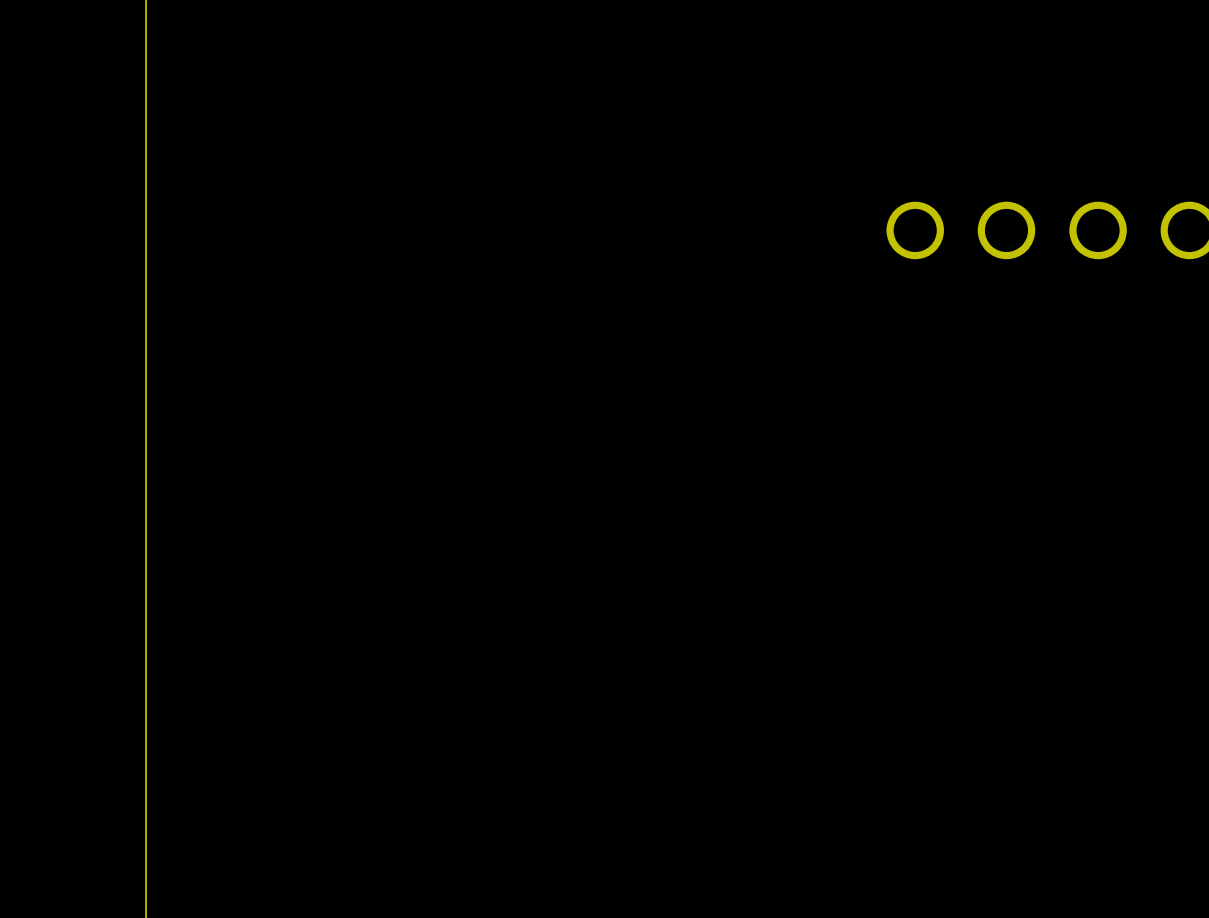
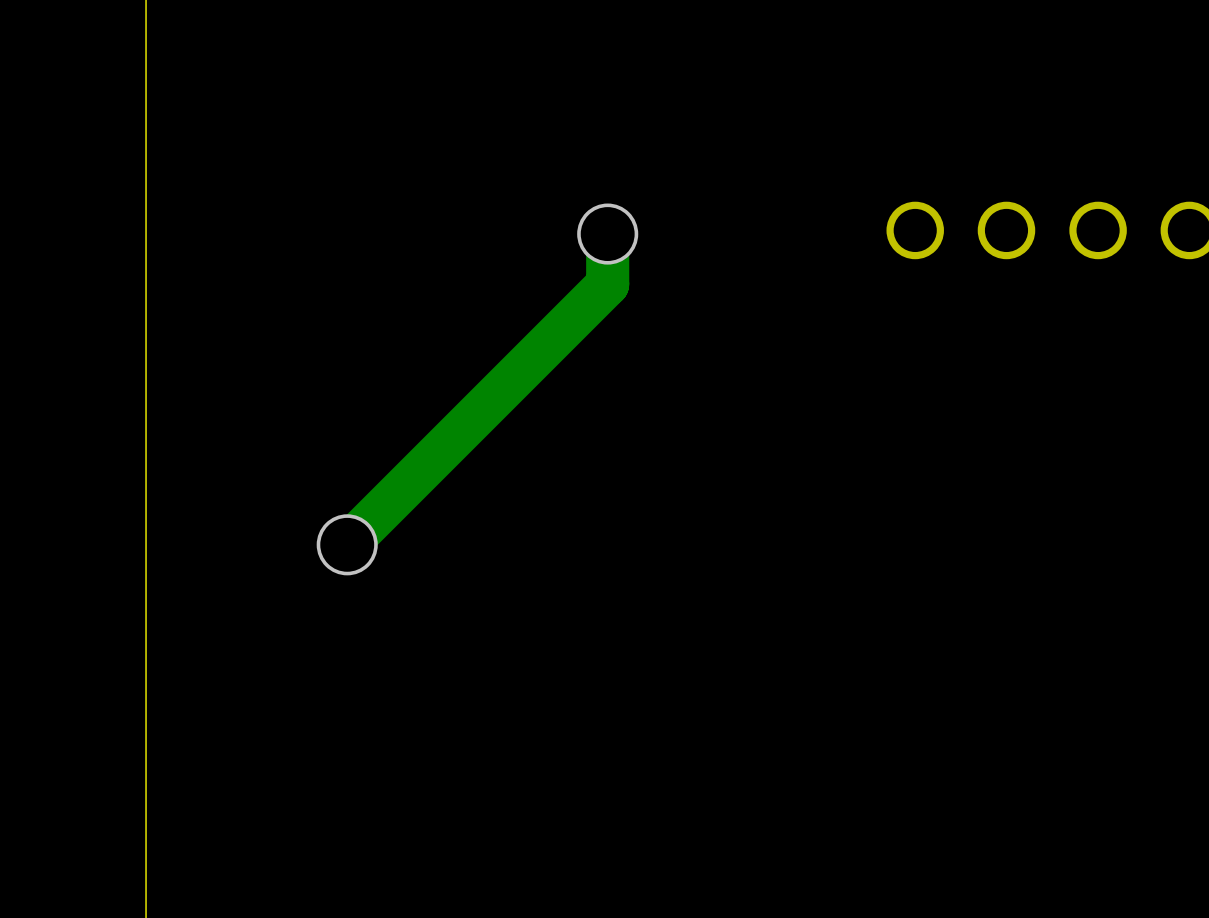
track: none -> (607, 234) (607, 284) (347, 544)
via: none -> (607, 234)
via: none -> (347, 544)

